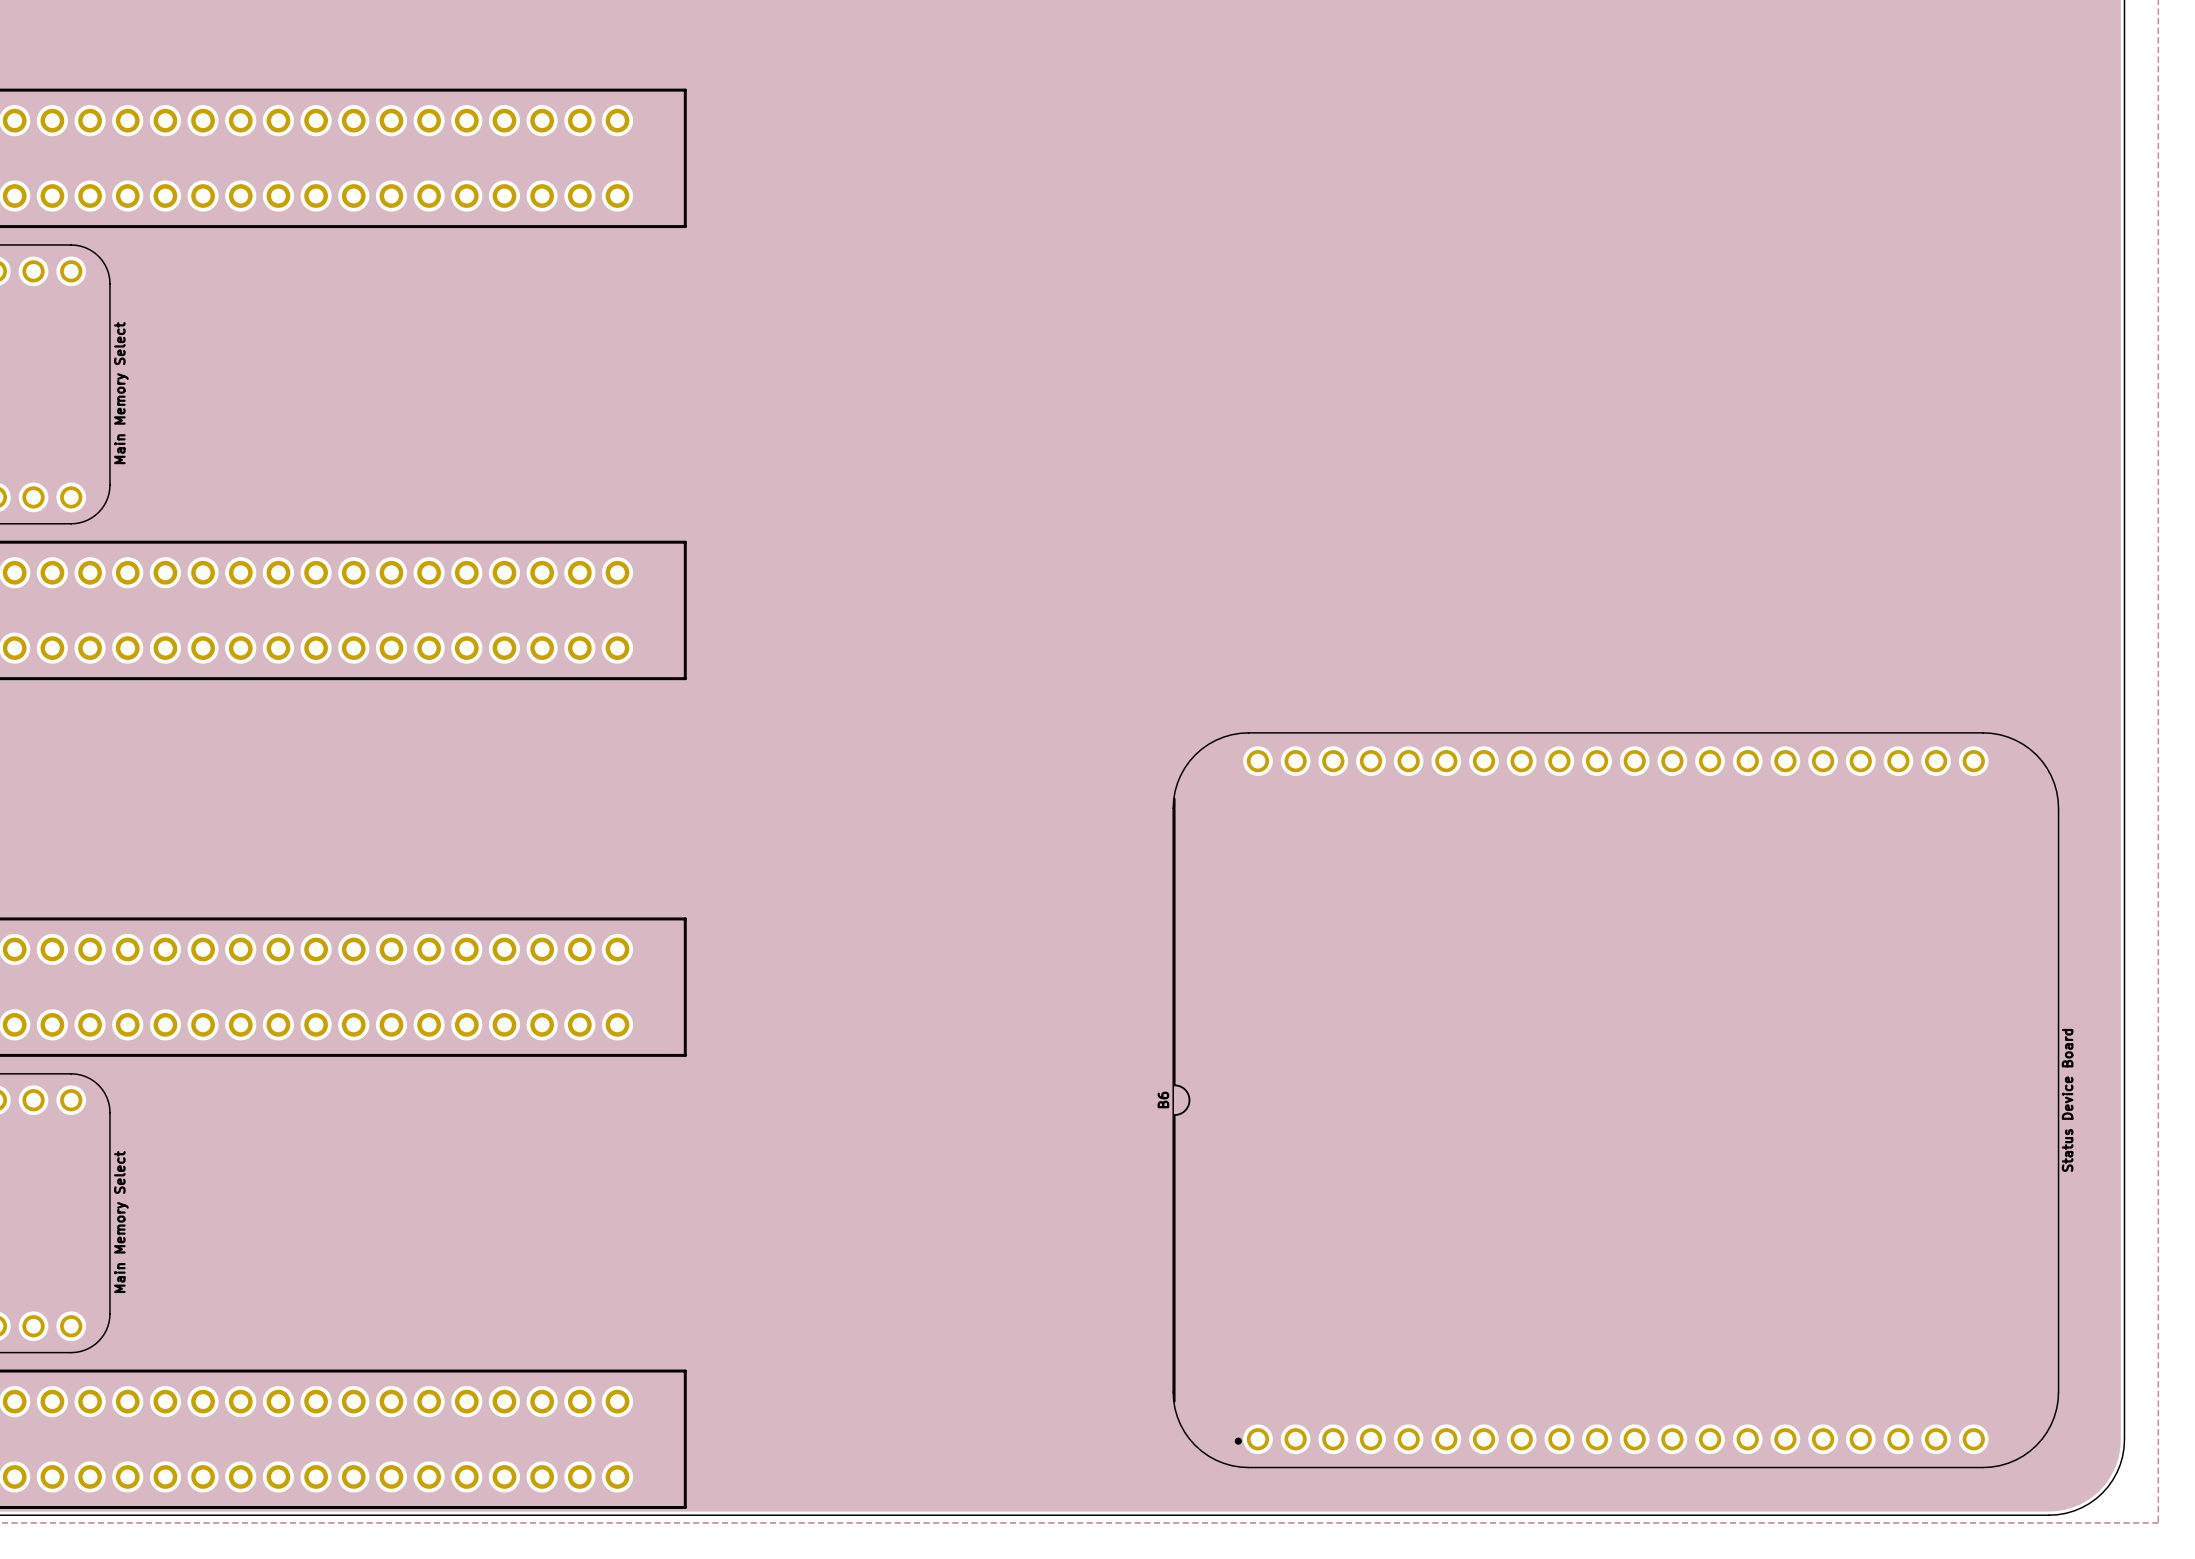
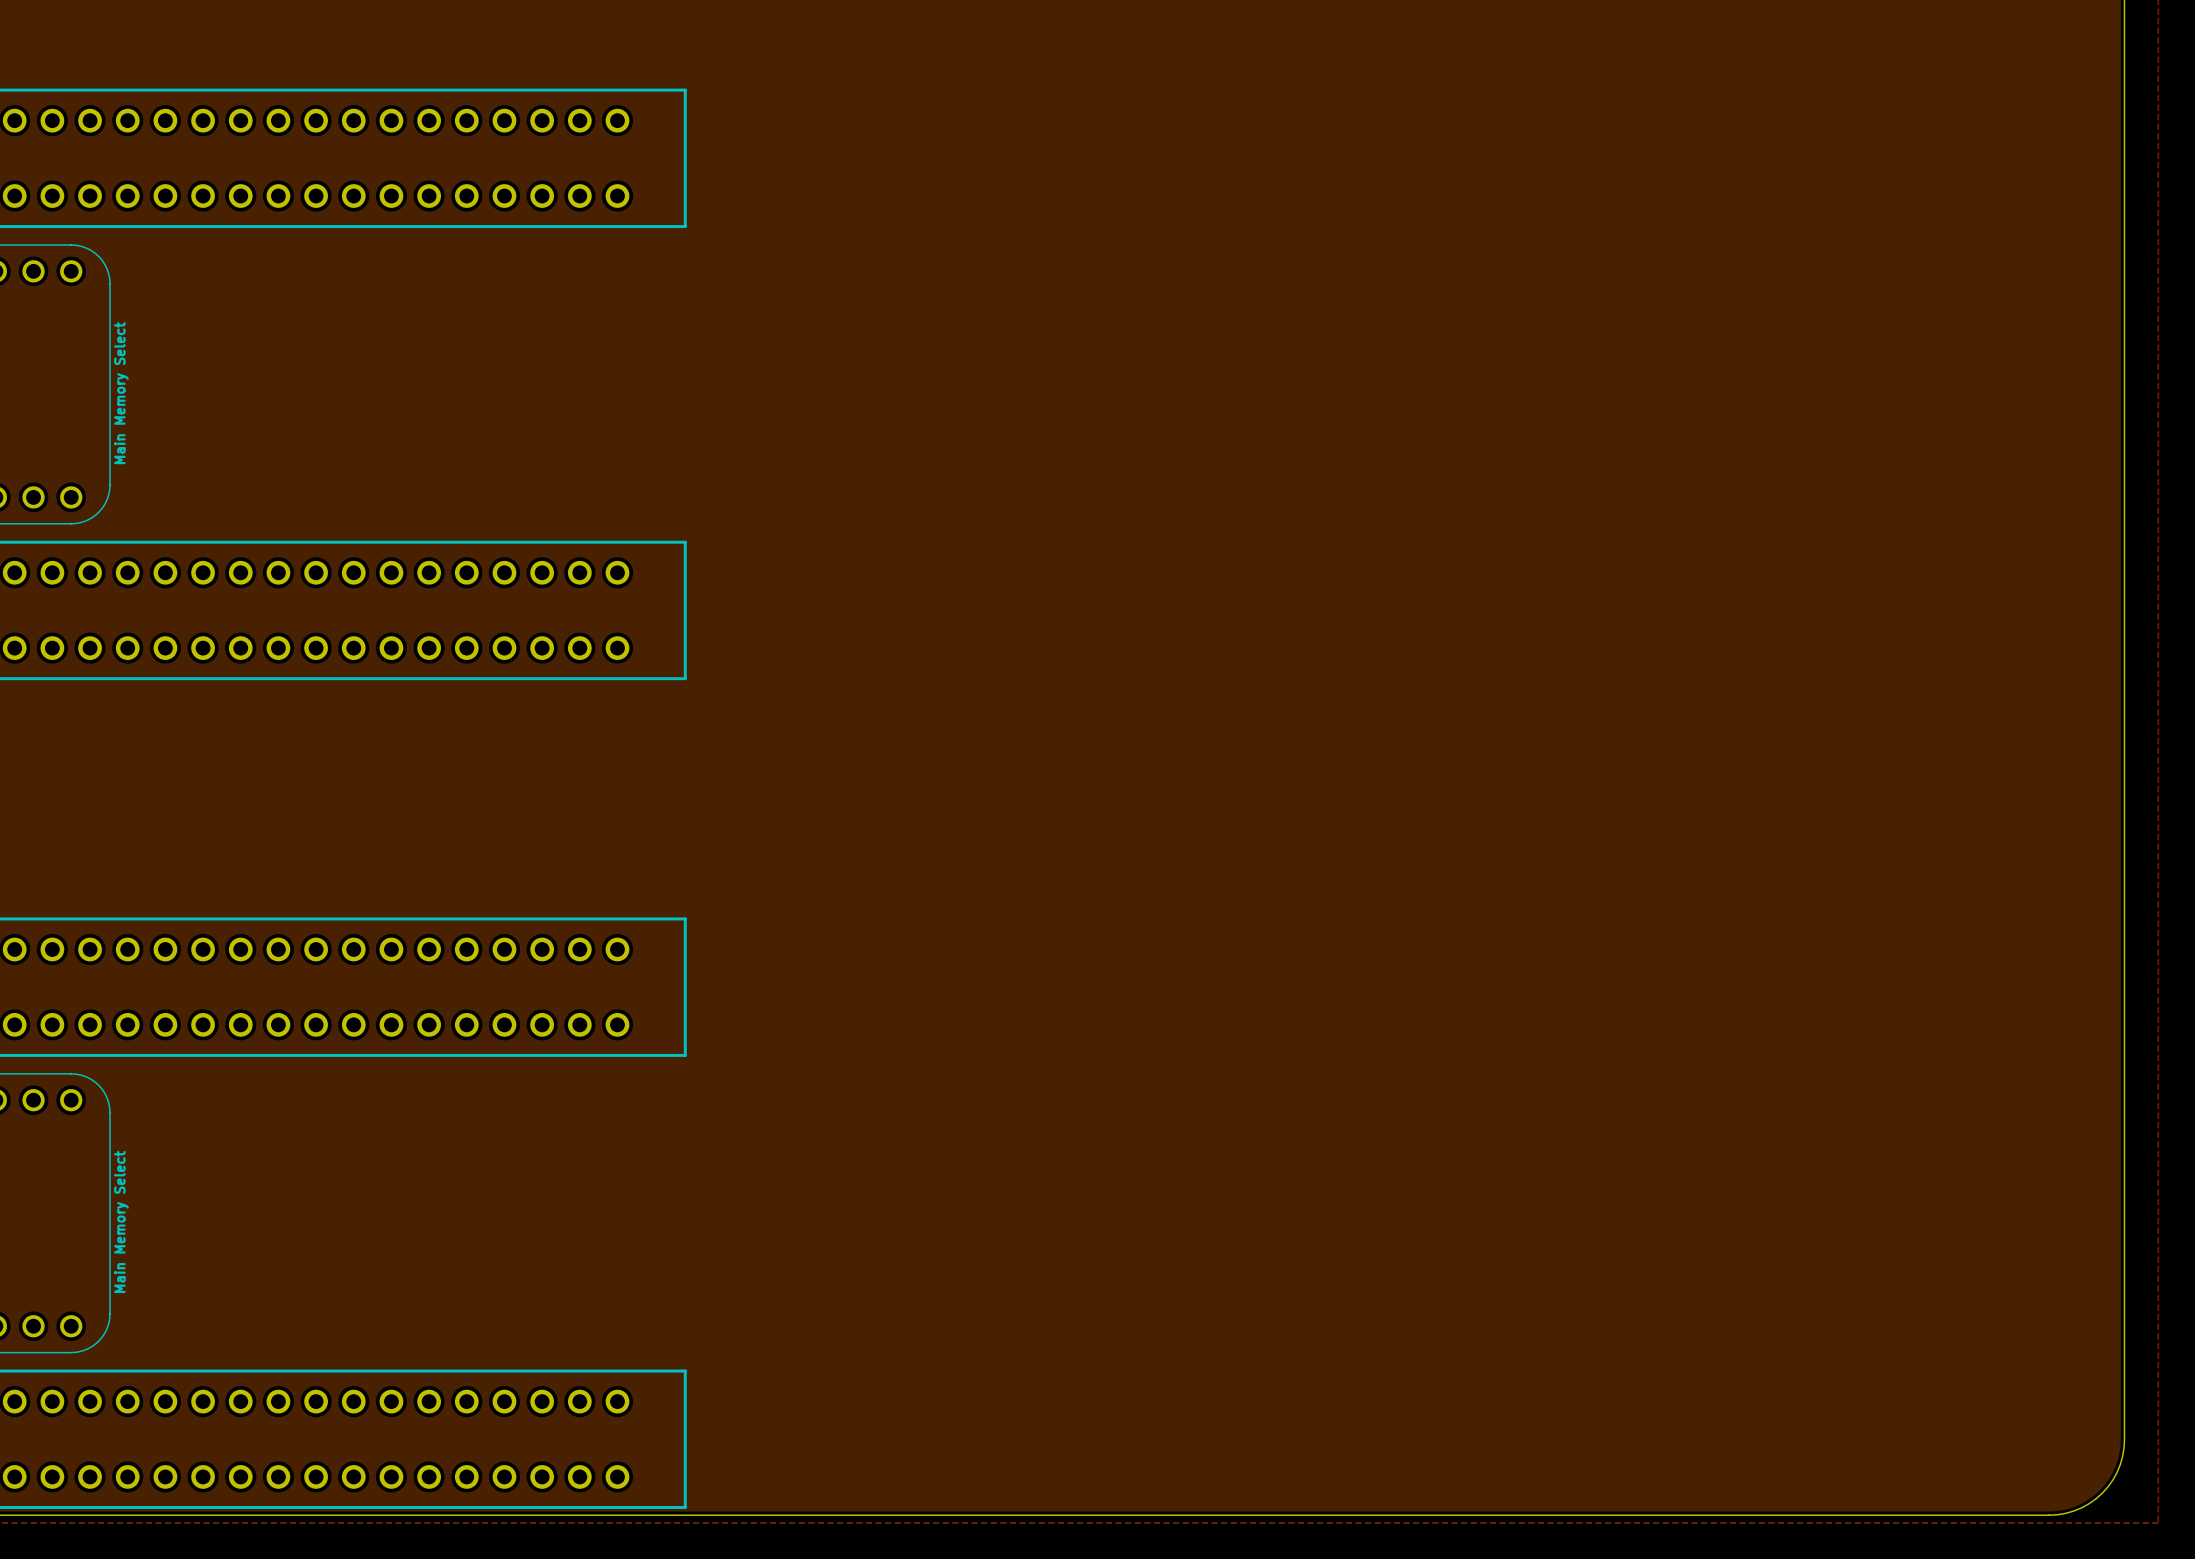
B6: (1615, 1100) -> none

